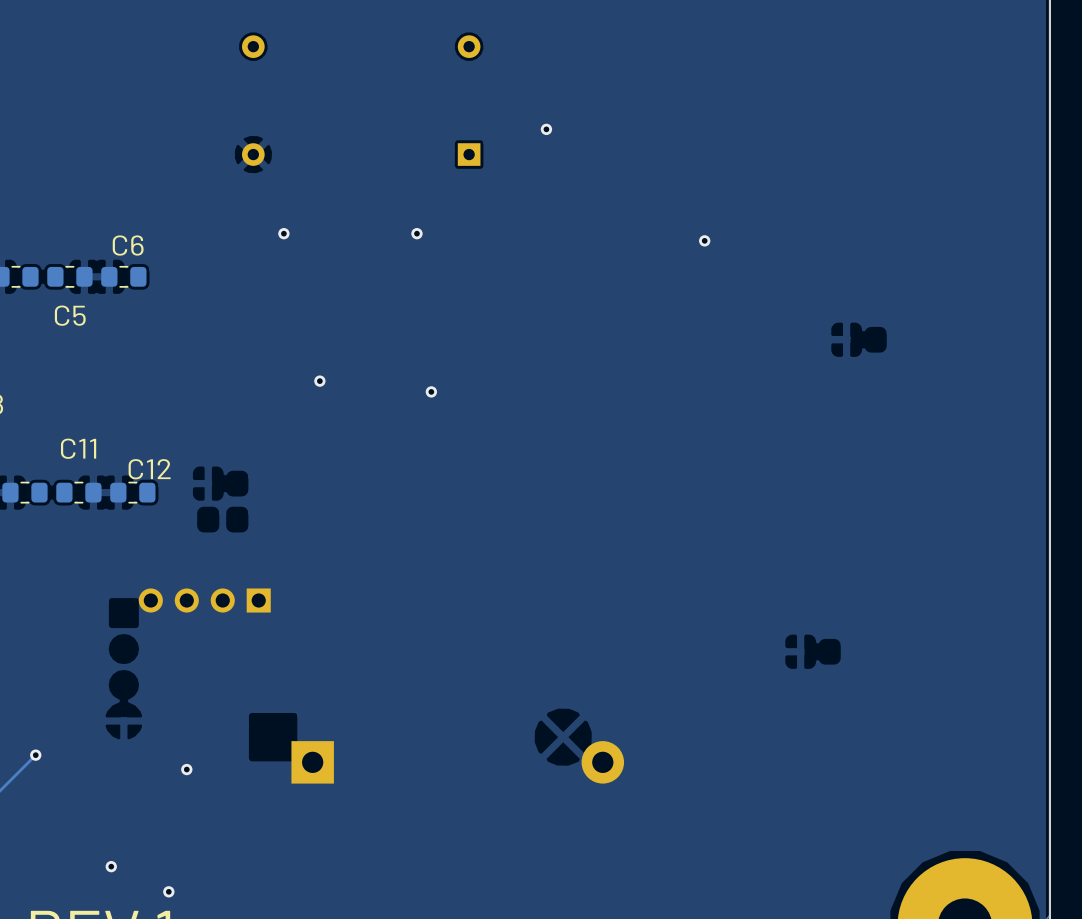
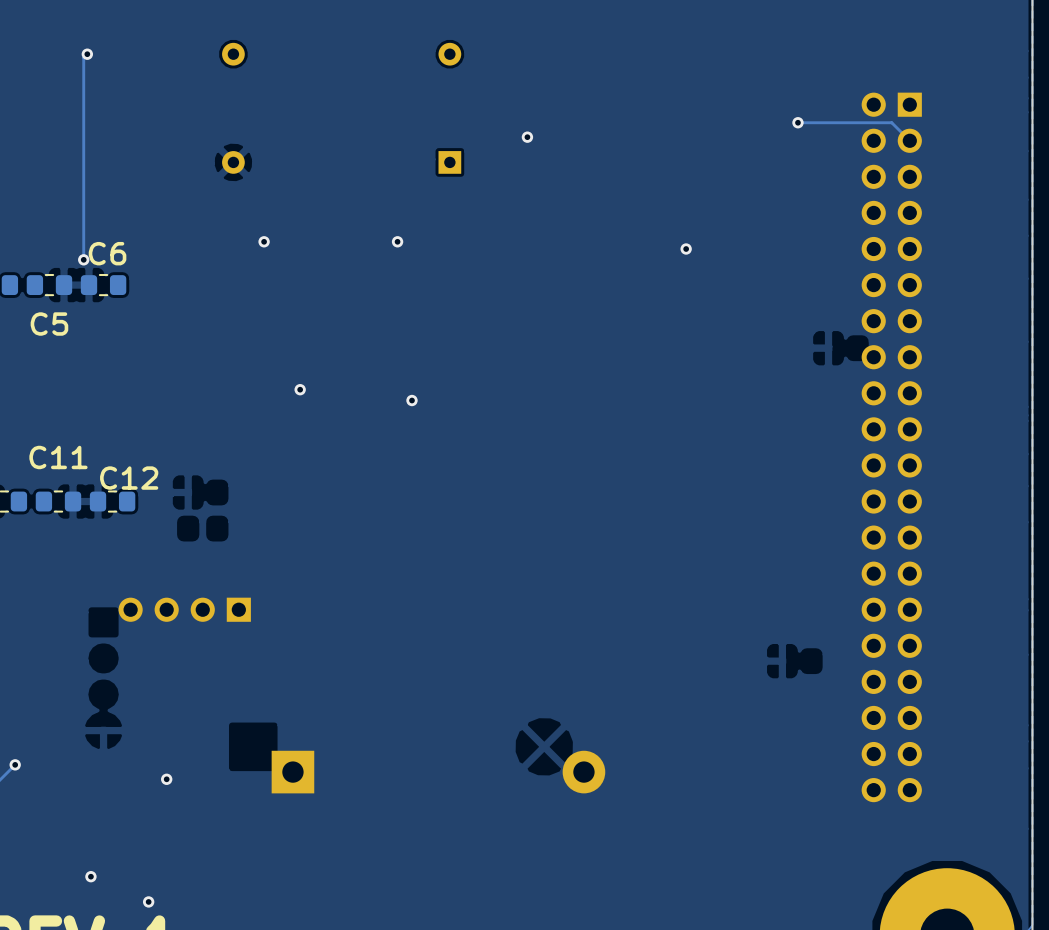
track: none -> (87, 54) (83, 57) (83, 259)
via: none -> (87, 54)
track: none -> (797, 122) (891, 122) (909, 140)
via: none -> (797, 122)
via: none -> (83, 259)
part: none -> (891, 447)

